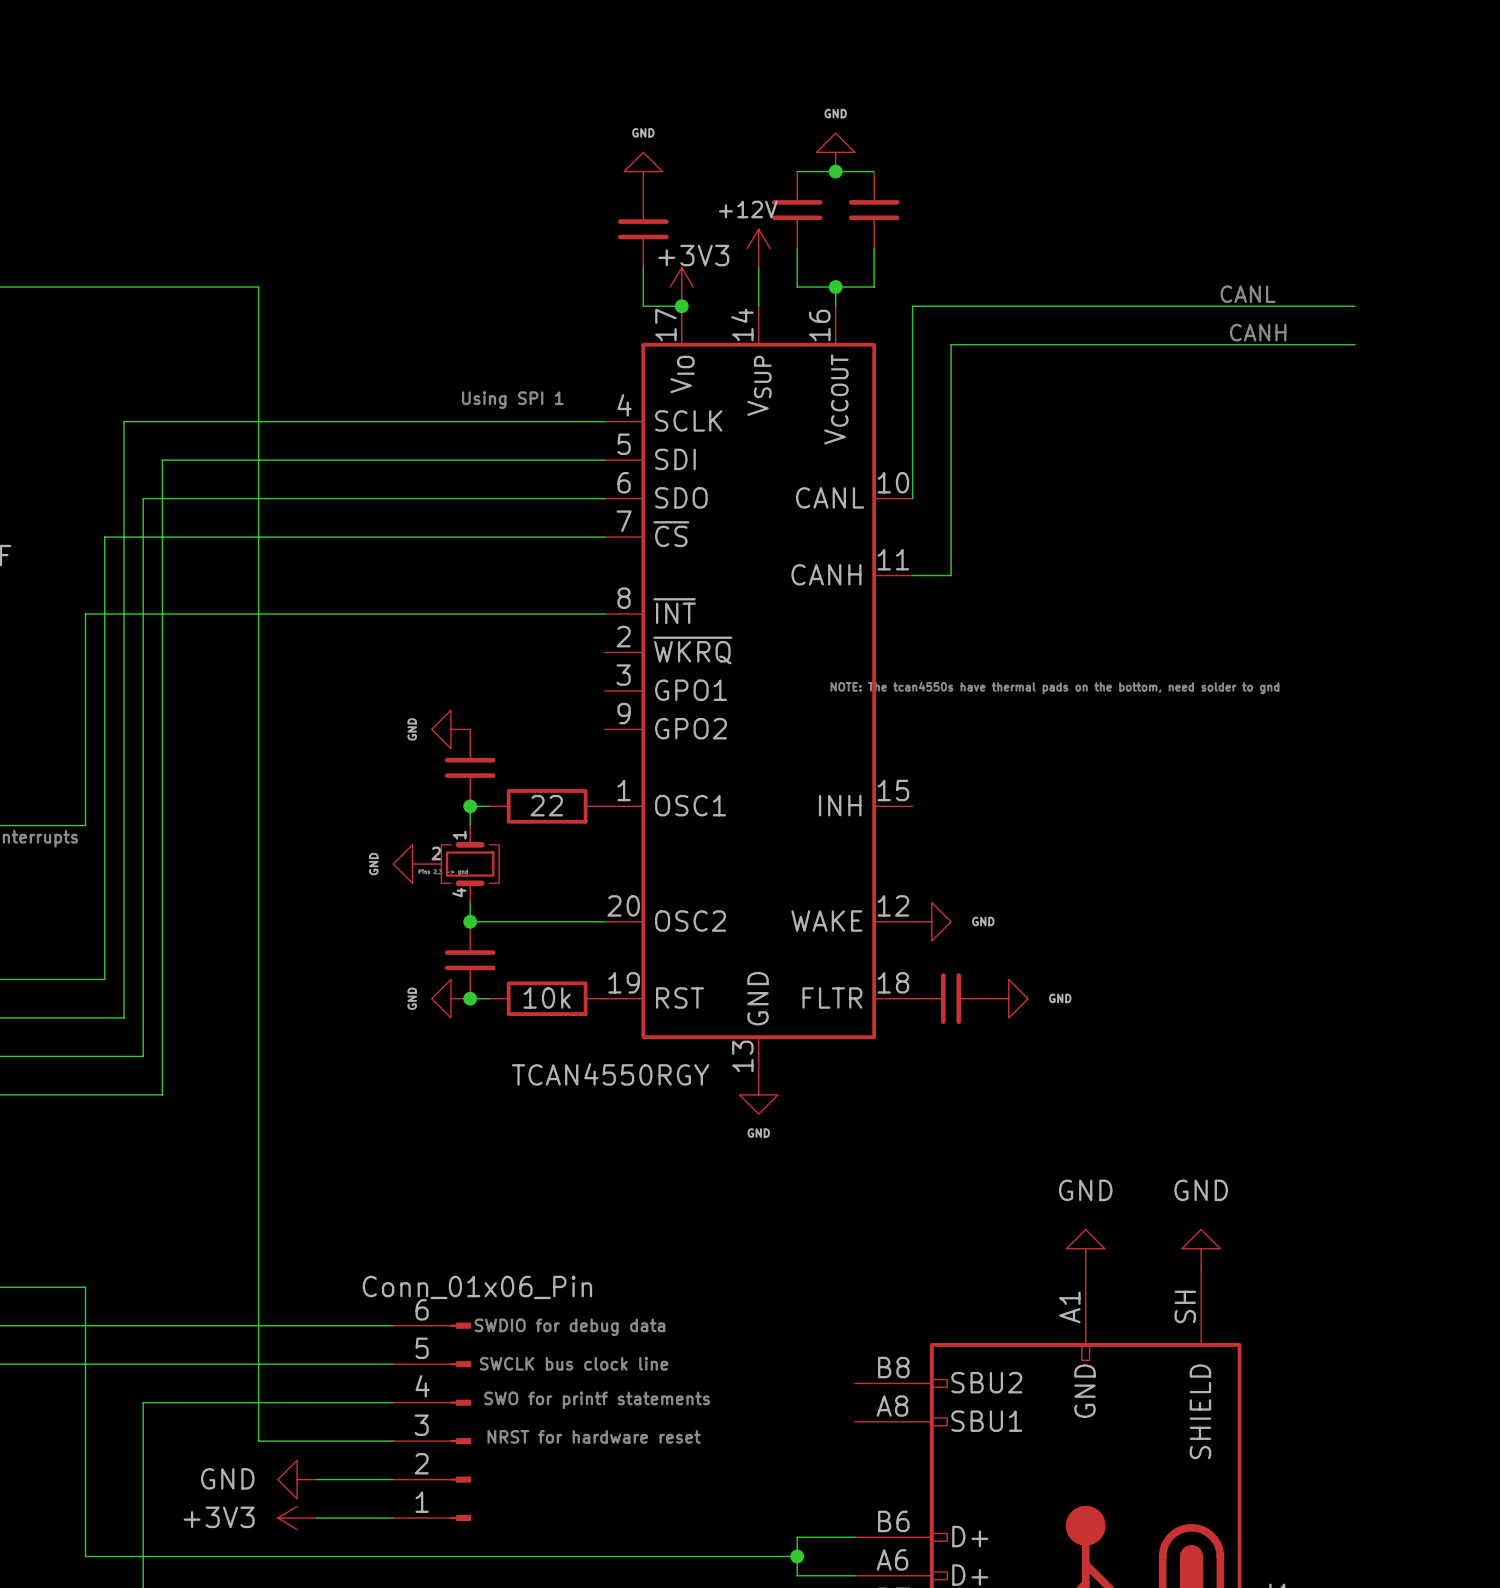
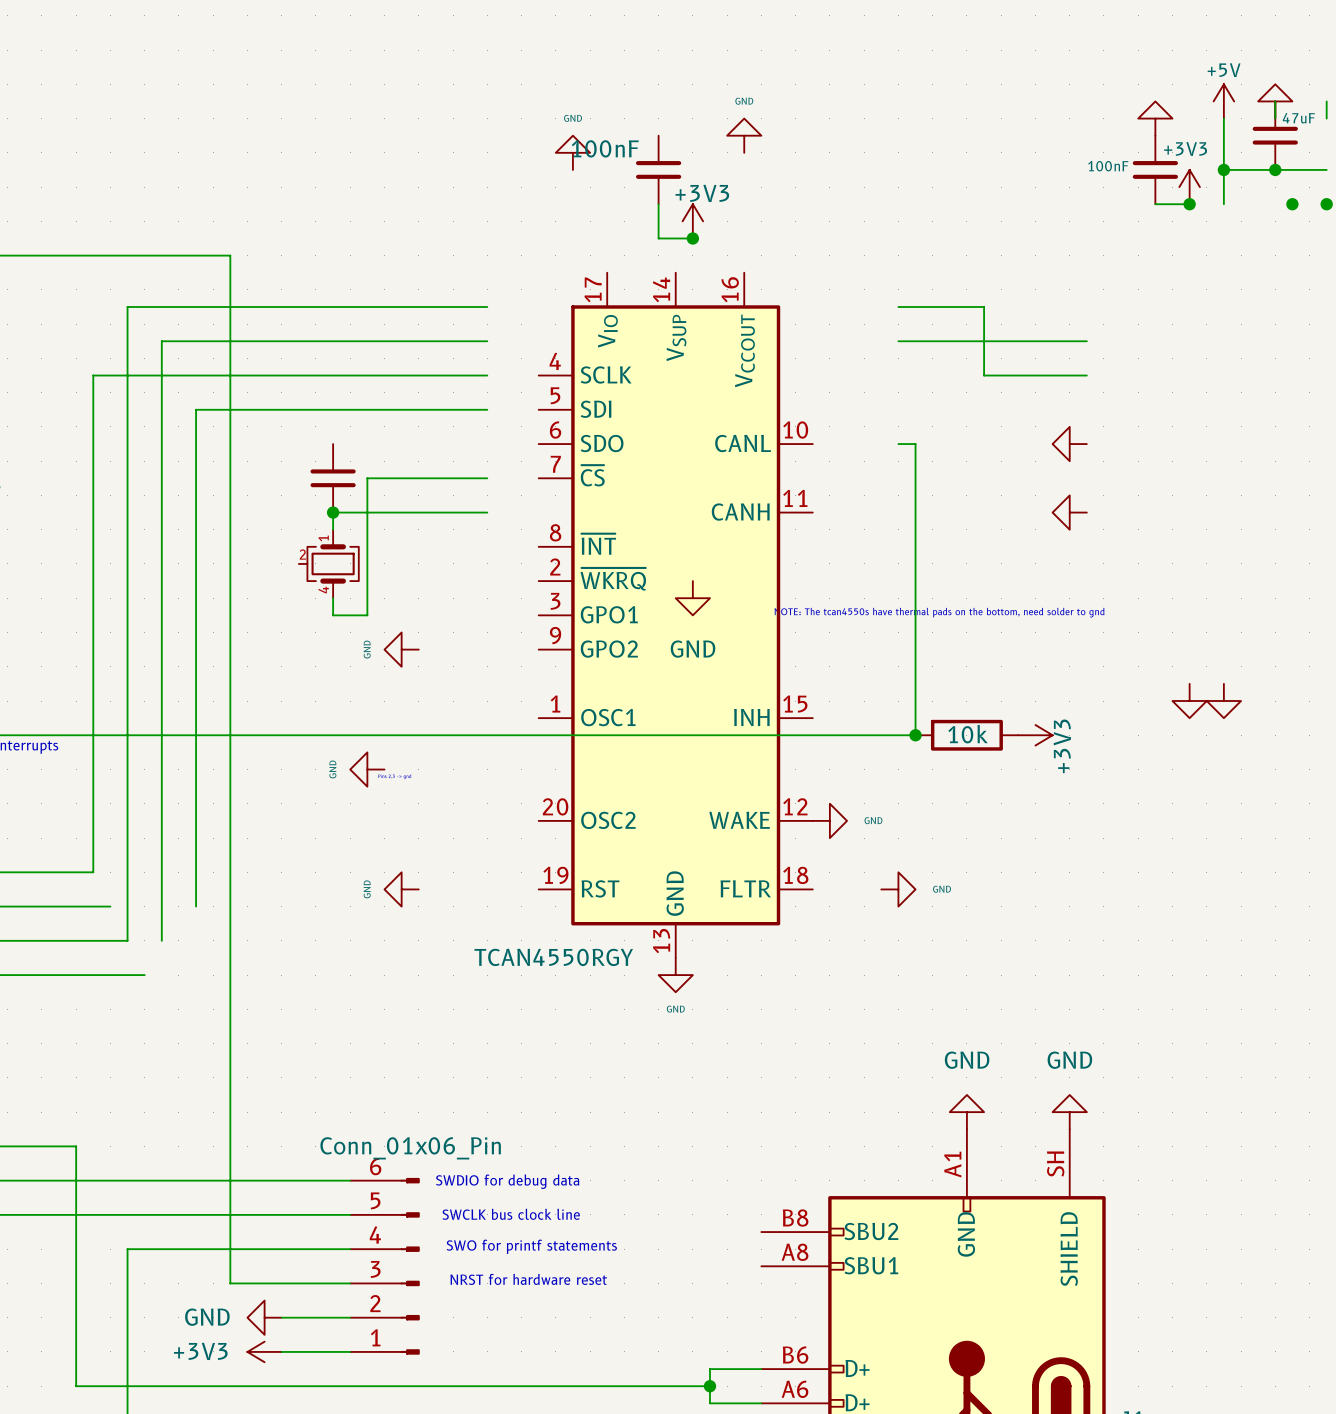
power symbol: none -> +5V (1223, 101)
wire: none -> (1275, 101) (1275, 118)
power symbol: none -> (1275, 101)
wire: none -> (1326, 101) (1326, 118)
power symbol: none -> (1155, 118)
wire: none -> (1223, 118) (1223, 204)
part: none -> 47uF (1275, 135)
wire: (797, 171) (874, 171) -> none
junction: (835, 171) -> none
part: none -> 100nF (658, 169)
part: none -> 100nF (1155, 169)
wire: none -> (1223, 169) (1326, 169)
junction: none -> (1223, 169)
junction: none -> (1275, 169)
part: (797, 210) -> none
part: (874, 210) -> none
power symbol: none -> +3V3 (1189, 187)
part: (643, 229) -> none
wire: none -> (1155, 204) (1189, 204)
junction: none -> (1189, 204)
junction: none -> (1292, 204)
junction: none -> (1326, 204)
power symbol: +12V (758, 248) -> none
wire: (797, 248) (797, 287) (874, 287) (874, 248) -> none
wire: (643, 267) (643, 306) (681, 306) -> (658, 204) (658, 238) (692, 238)
wire: (758, 267) (758, 306) -> none
junction: none -> (692, 238)
power symbol position: +3V3 (681, 287) -> +3V3 (692, 221)
wire: (835, 287) (835, 306) -> none
junction: (835, 287) -> none
text: CANL (1248, 294) -> none
junction: (681, 306) -> none
wire: (1355, 306) (912, 306) (912, 498) -> none
text: CANH (1258, 332) -> none
wire: (1008, 344) (951, 344) (951, 575) (912, 575) -> none
wire: (1104, 344) (1355, 344) -> (984, 307) (984, 375) (1086, 375)
wire: none -> (487, 341) (161, 341) (161, 940)
wire: none -> (898, 341) (1086, 341)
text: Using SPI 1 (512, 400) -> none
wire: (123, 421) (123, 1017) -> (110, 375) (93, 375) (93, 478)
wire: (547, 421) (604, 421) -> none
wire: (220, 460) (162, 460) (162, 1094) -> (196, 409) (196, 906)
wire: (547, 460) (604, 460) -> none
wire: (143, 498) (604, 498) -> (127, 444) (127, 307) (487, 307)
power symbol: none -> (1069, 444)
wire: (104, 537) (412, 537) -> (333, 598) (333, 615) (367, 615) (367, 478)
part: none -> (333, 478)
wire: (547, 537) (604, 537) -> none
junction: none -> (333, 512)
wire: none -> (487, 512) (333, 512) (333, 529)
power symbol: none -> (1069, 512)
wire: (604, 614) (85, 614) (85, 825) -> (898, 444) (915, 444) (915, 735) (76, 735)
power symbol: none -> GND (692, 598)
part: (470, 767) -> none
power symbol: none -> (1189, 701)
power symbol: none -> (1223, 701)
junction: (470, 806) -> none
wire: (489, 806) (470, 806) (470, 825) -> none
part: 22 (547, 806) -> none
junction: none -> (915, 735)
part: none -> 10k (966, 735)
power symbol: none -> +3V3 (1035, 735)
part position: (465, 864) -> (328, 563)
wire: (470, 902) (470, 921) (604, 921) -> none
junction: (470, 921) -> none
part: (470, 960) -> none
wire: (470, 998) (489, 998) -> none
junction: (470, 998) -> none
part: 10k (547, 998) -> none
part: (951, 998) -> none

